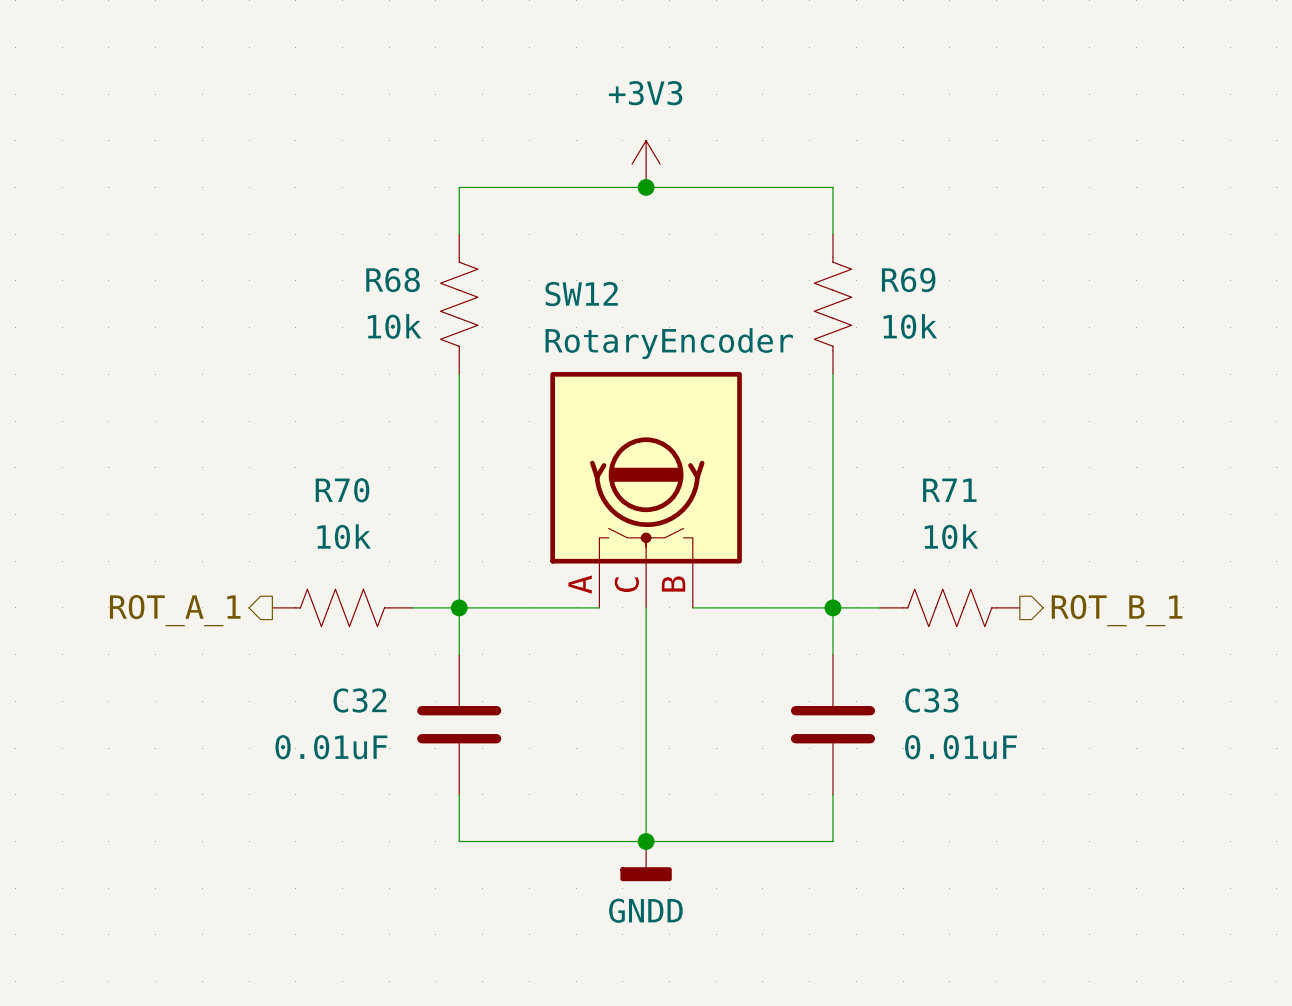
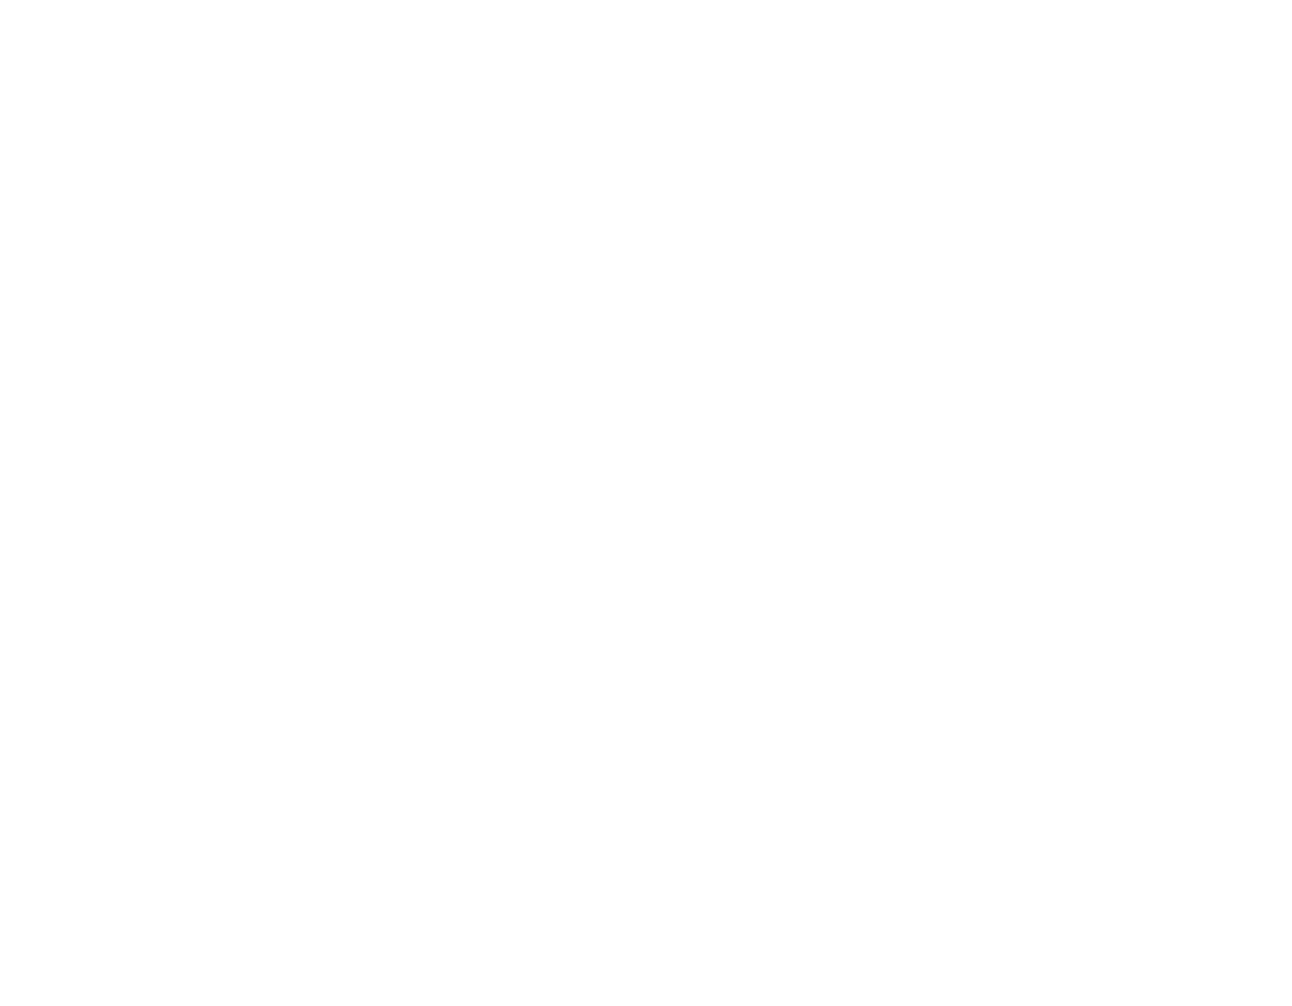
power symbol: +3V3 (646, 164) -> none
junction: (646, 187) -> none
wire: (459, 234) (459, 187) (832, 187) (832, 234) -> none
R68: 10k (459, 304) -> none
R69: 10k (832, 304) -> none
wire: (459, 374) (459, 654) -> none
wire: (832, 374) (832, 654) -> none
SW12: RotaryEncoder (646, 489) -> none
R70: 10k (342, 607) -> none
wire: (412, 607) (599, 607) -> none
junction: (459, 607) -> none
wire: (646, 607) (646, 841) -> none
wire: (692, 607) (879, 607) -> none
junction: (832, 607) -> none
R71: 10k (949, 607) -> none
hierarchical label: ROT_A_1 (175, 610) -> none
hierarchical label: ROT_B_1 (1117, 610) -> none
C32: 0.01uF (459, 724) -> none
C33: 0.01uF (832, 724) -> none
wire: (459, 794) (459, 841) (832, 841) (832, 794) -> none
junction: (646, 841) -> none
power symbol: GNDD (646, 861) -> none

